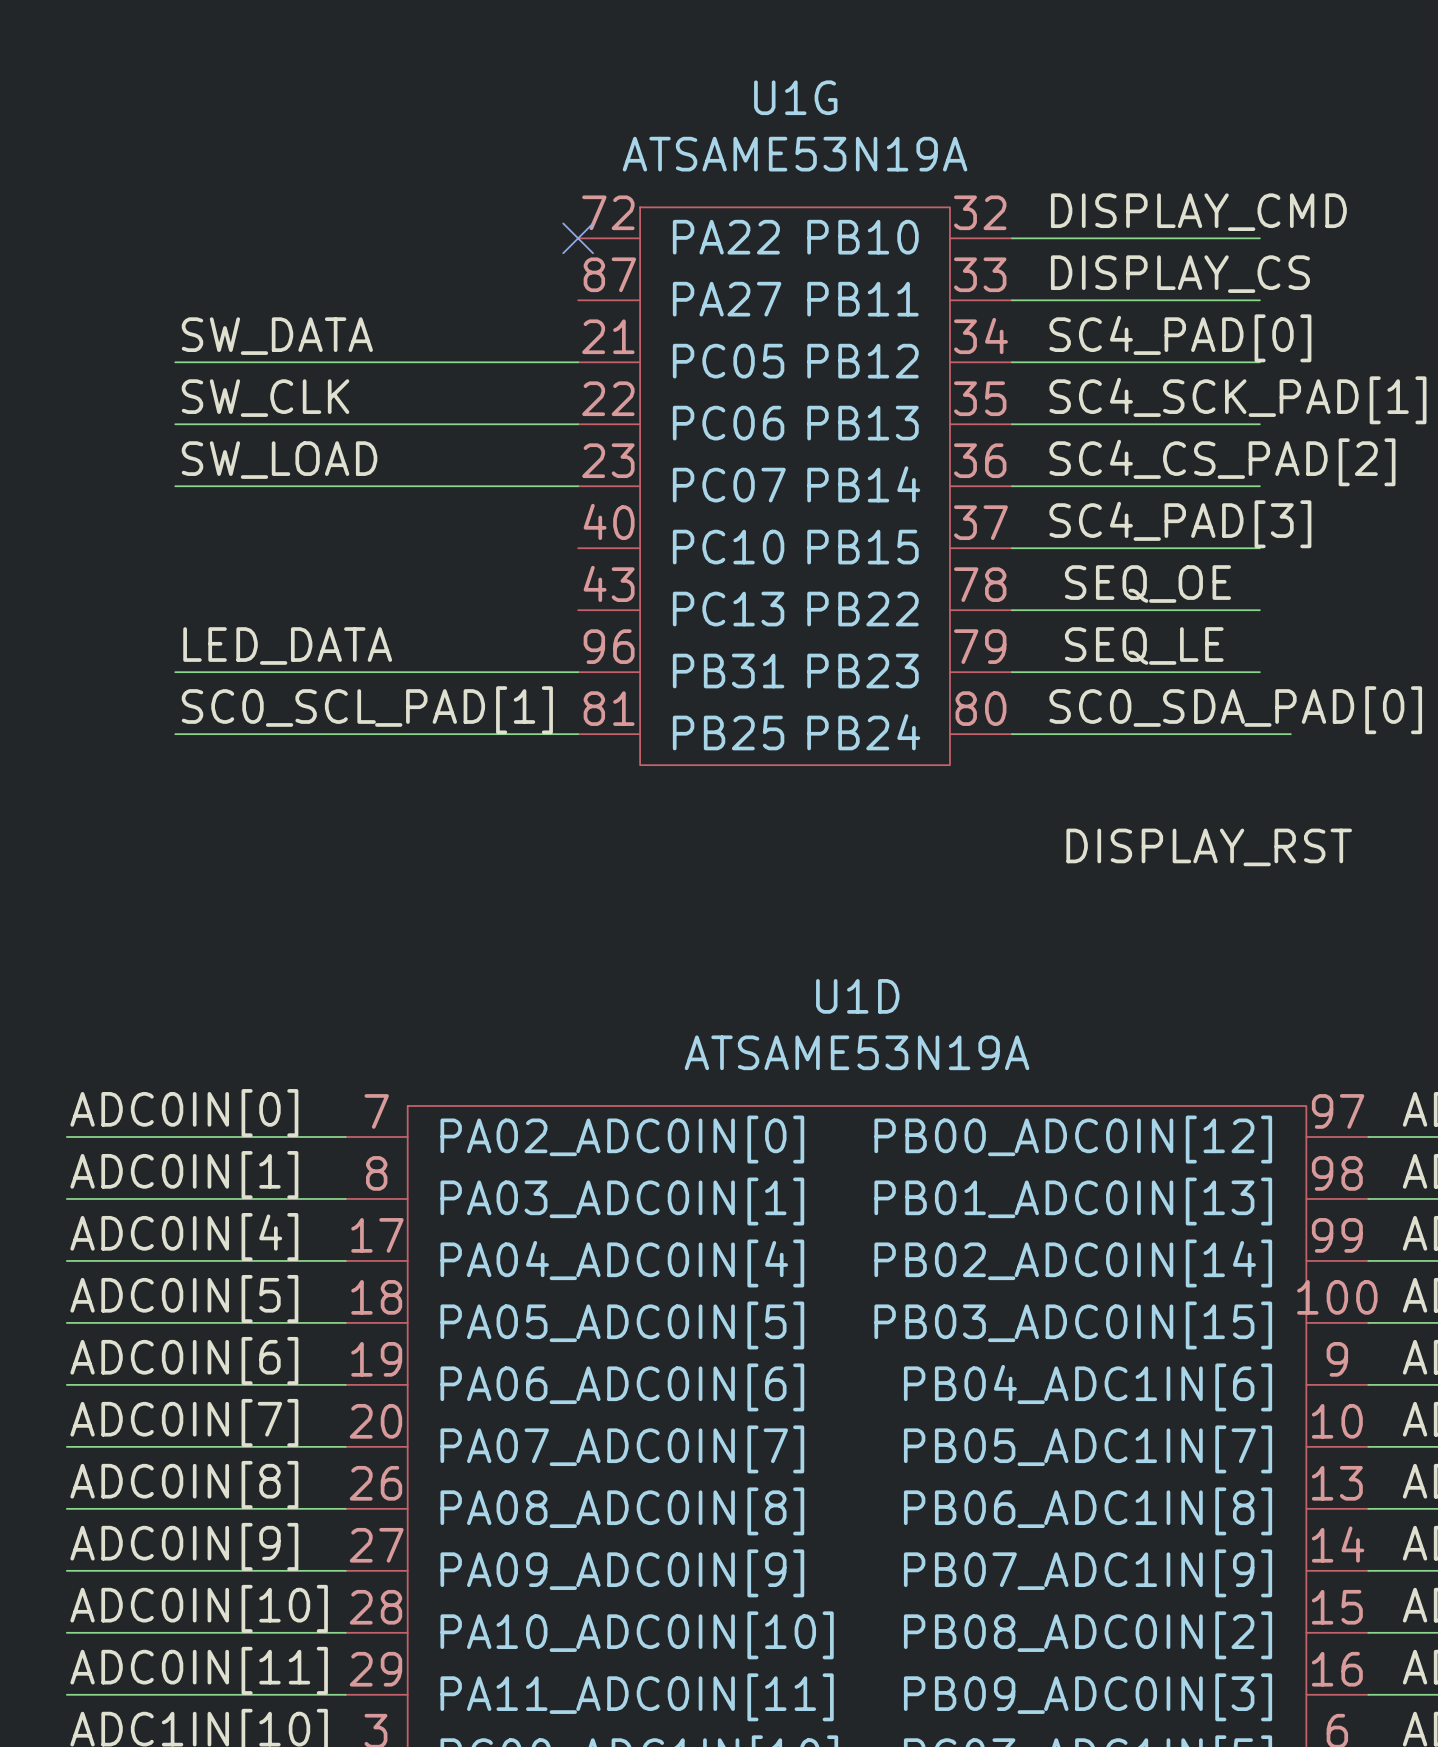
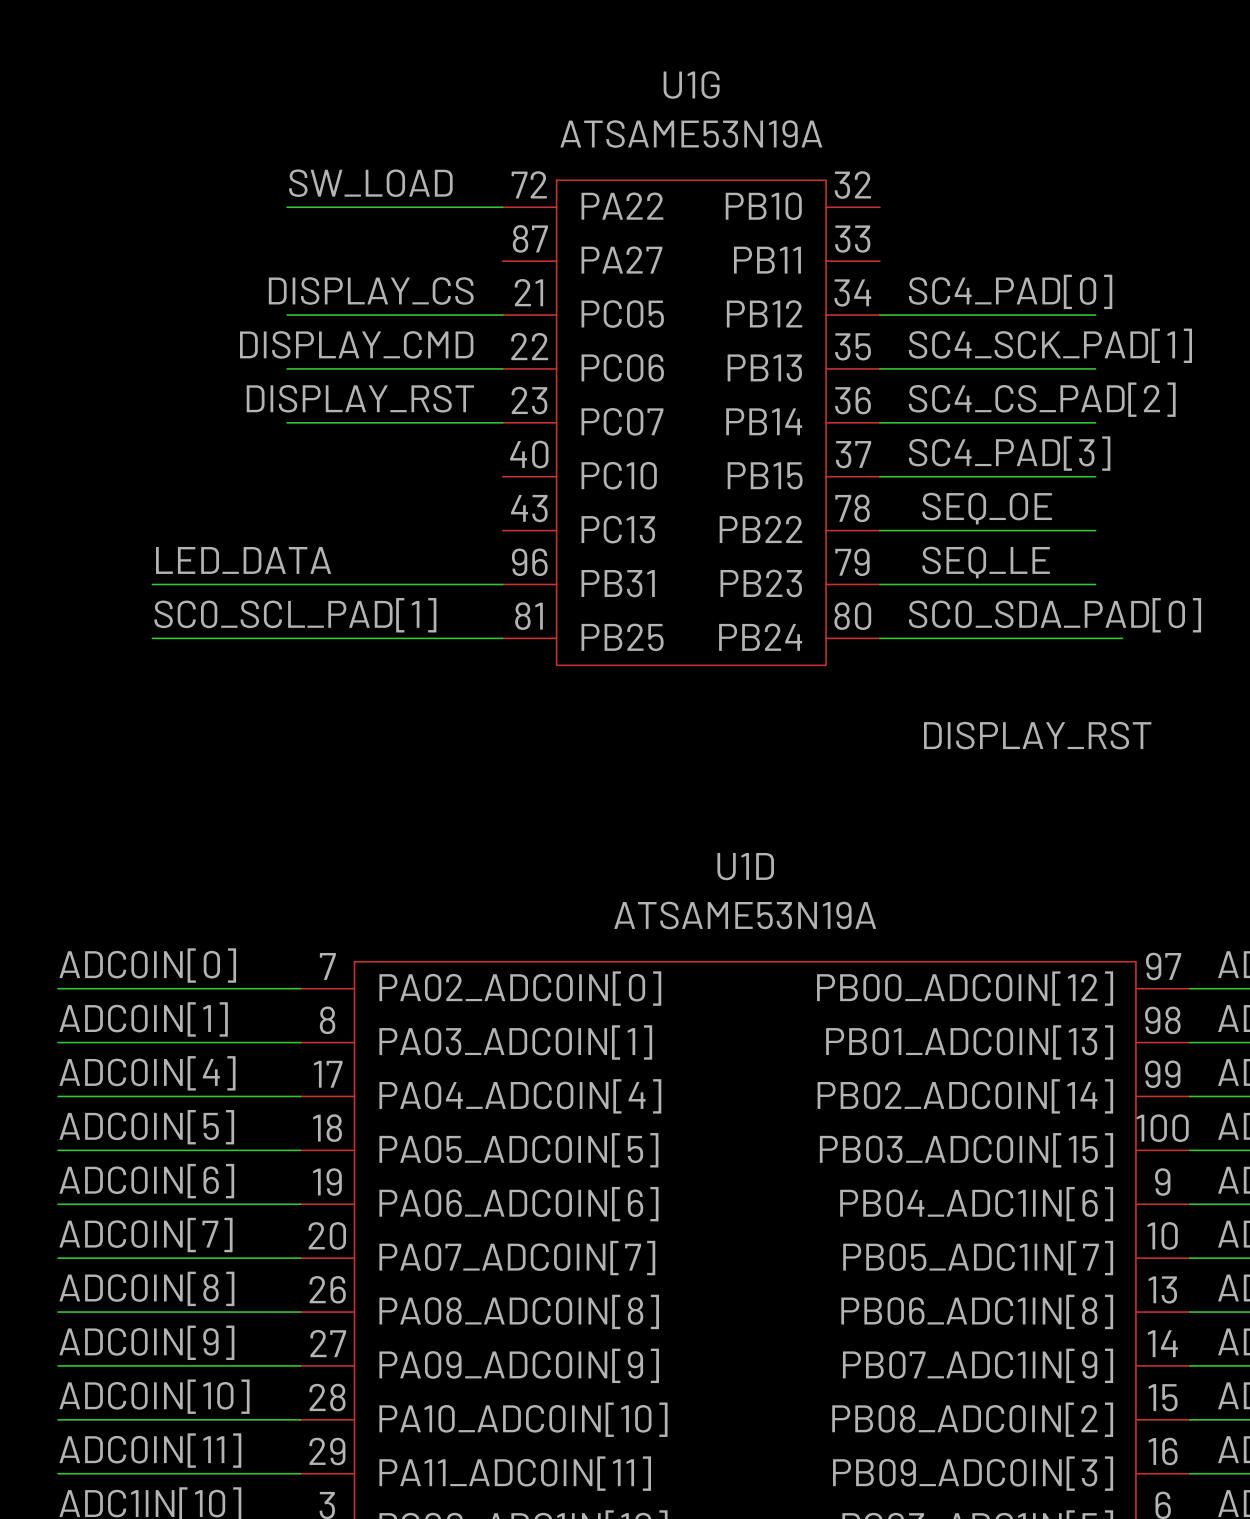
label position: DISPLAY_CMD (1198, 212) -> DISPLAY_CMD (356, 344)
wire: none -> (287, 207) (502, 207)
no-connect mark: (578, 238) -> none
wire: (1011, 238) (1259, 238) -> none
label position: DISPLAY_CS (1180, 274) -> DISPLAY_CS (371, 291)
wire: (1011, 300) (1259, 300) -> none
label: SW_DATA (277, 336) -> none
wire: (175, 362) (330, 362) -> none
label: SW_CLK (265, 398) -> none
wire: (175, 424) (330, 424) -> none
label position: SW_LOAD (279, 460) -> SW_LOAD (370, 183)
label: none -> DISPLAY_RST (360, 398)
wire: (175, 486) (330, 486) -> none

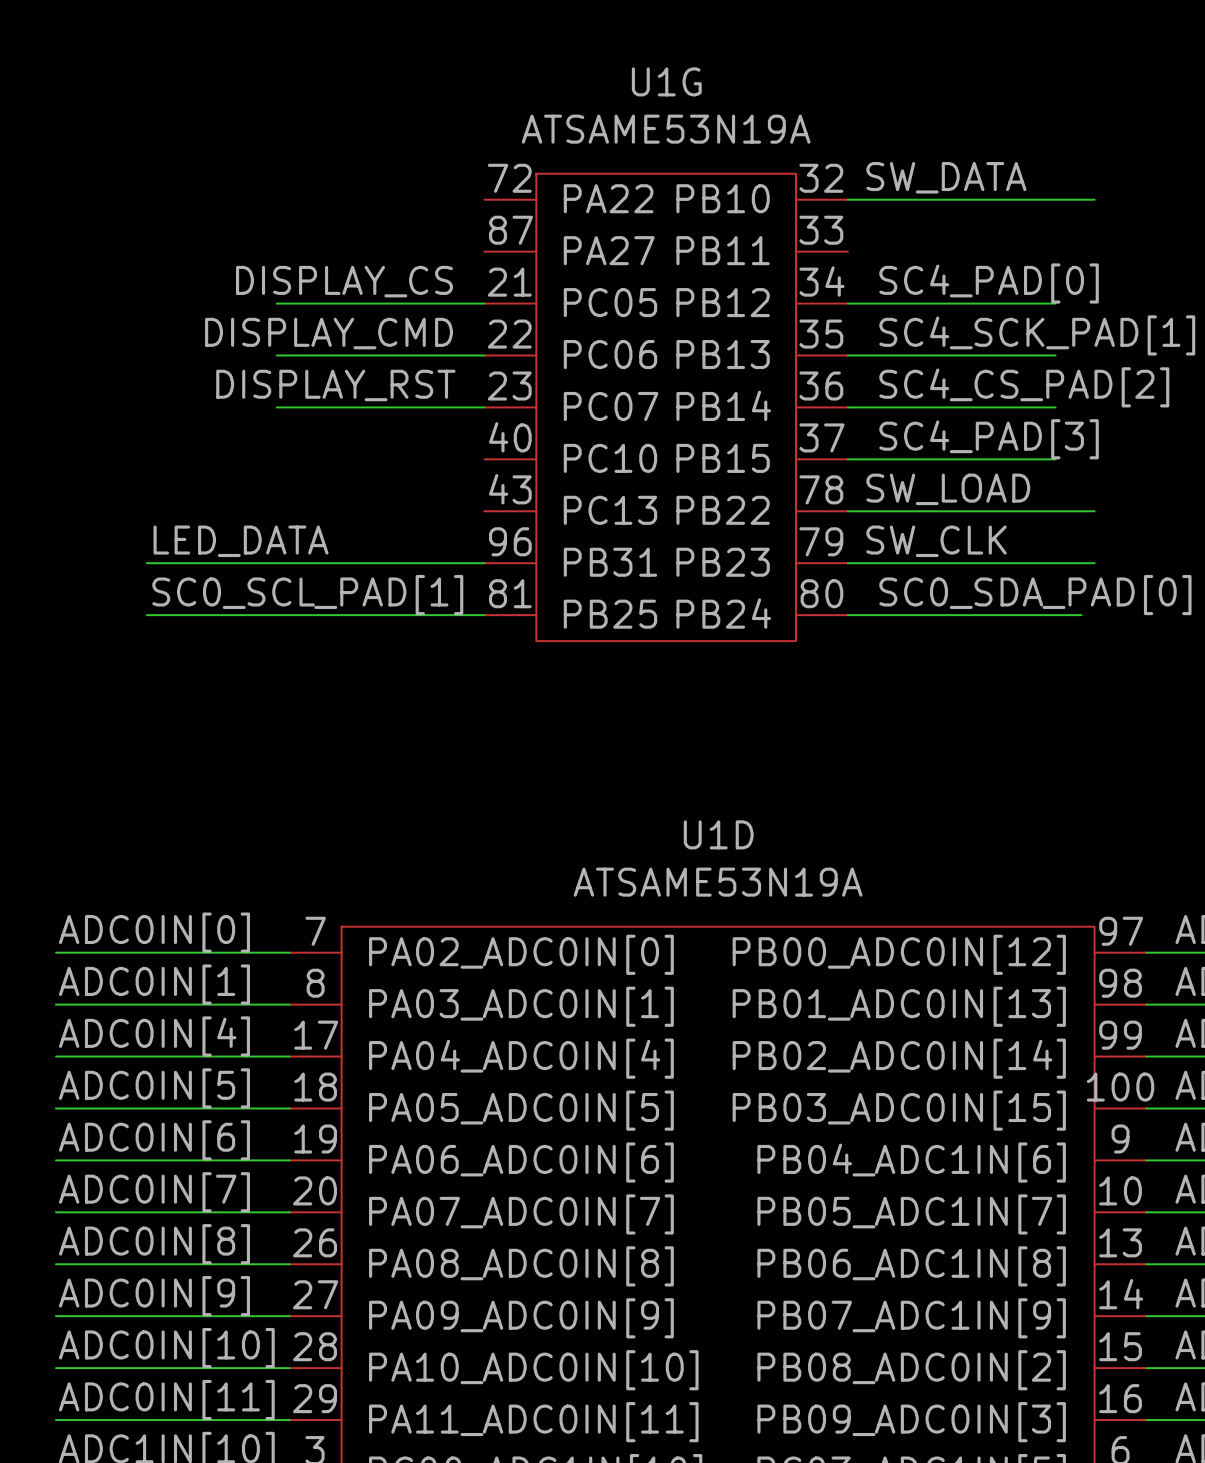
label: SW_LOAD (370, 183) -> none
label: none -> SW_DATA (946, 177)
wire: (287, 207) (502, 207) -> none
wire: none -> (847, 199) (1094, 199)
label: none -> SW_LOAD (948, 489)
label: SEQ_OE (987, 508) -> none
wire: none -> (1055, 511) (1094, 511)
label: none -> SW_CLK (936, 541)
label: SEQ_LE (986, 562) -> none
wire: none -> (1055, 563) (1094, 563)
label: DISPLAY_RST (1037, 735) -> none

